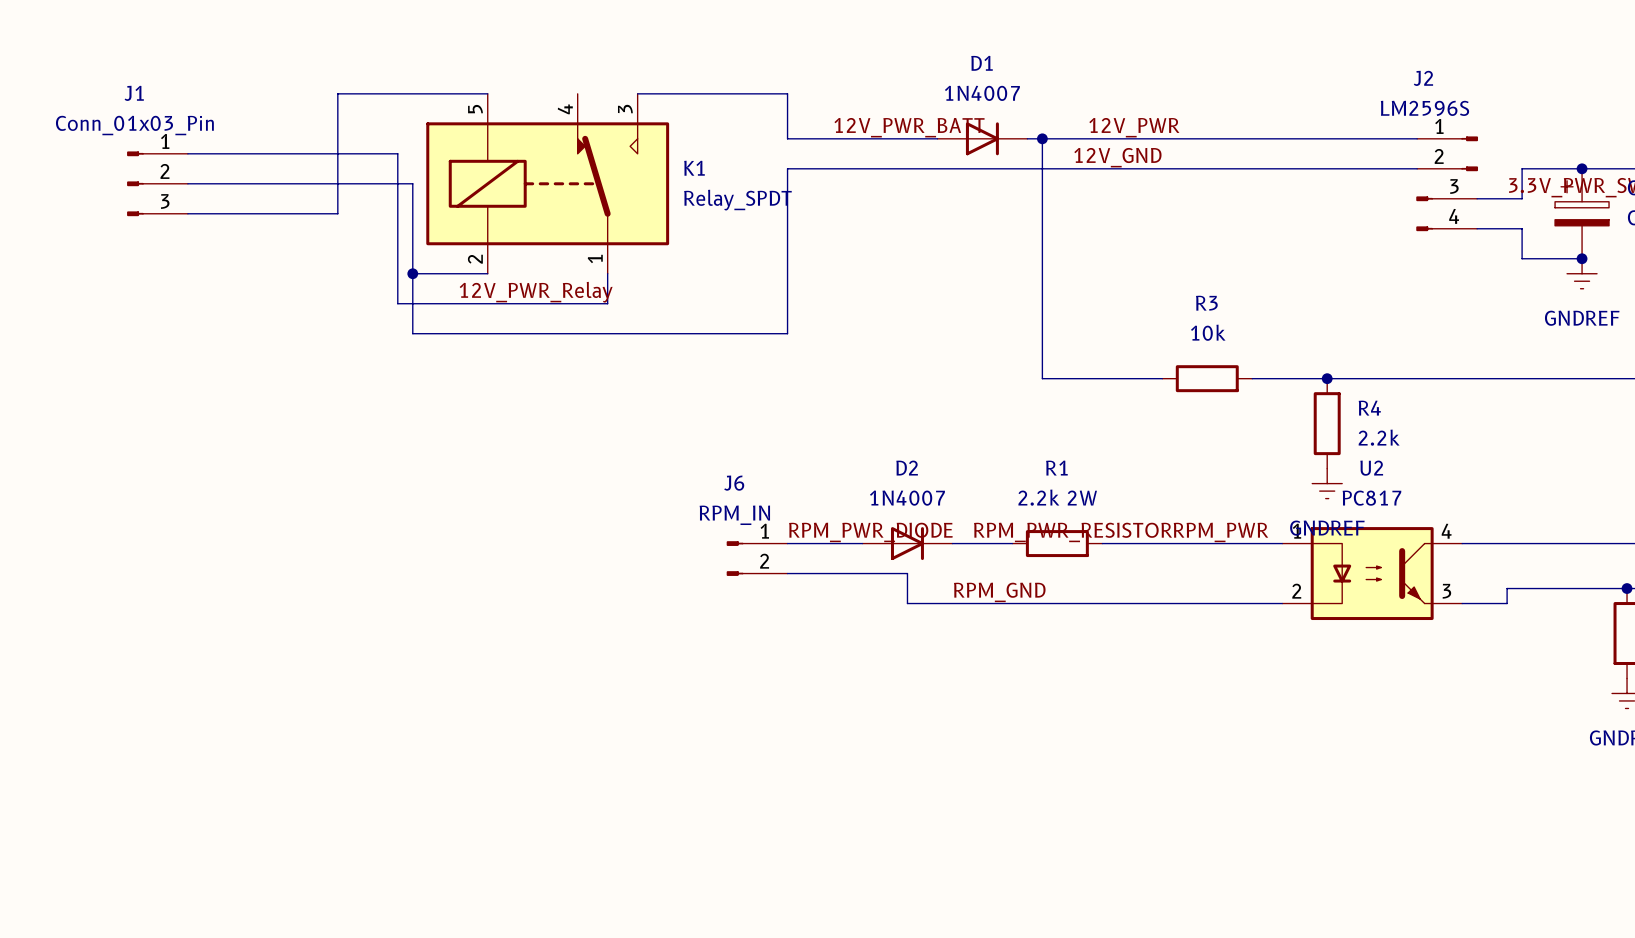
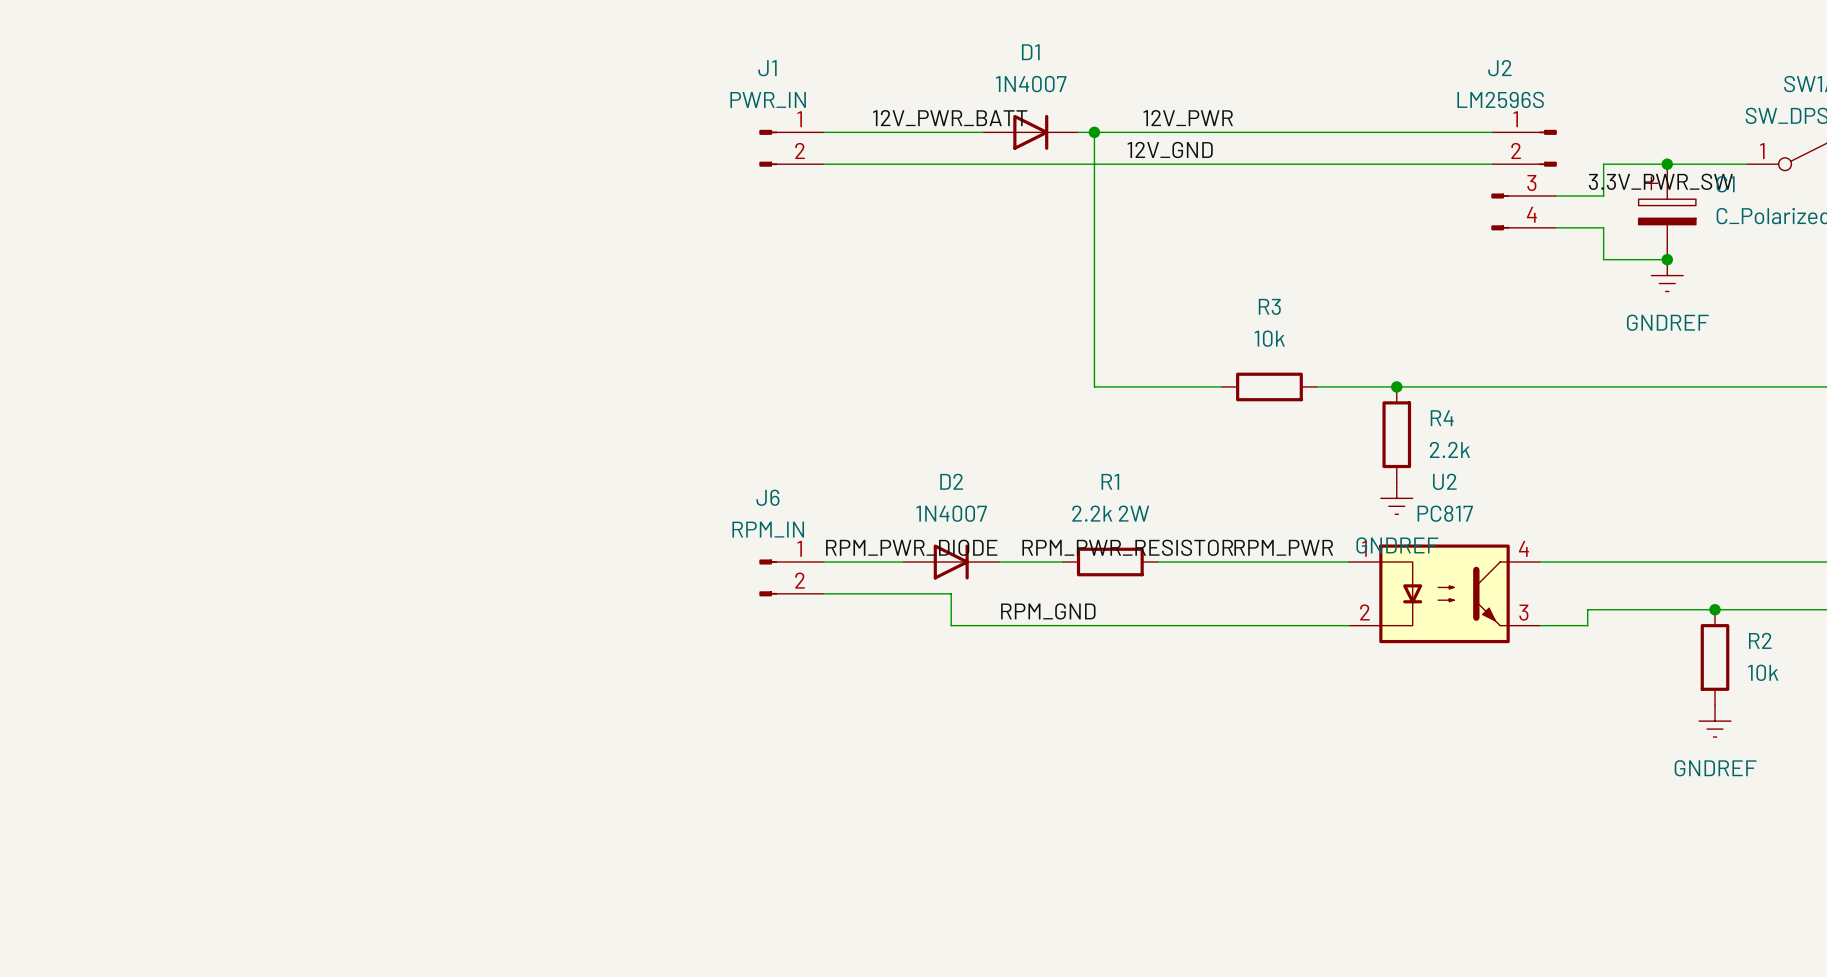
wire: (487, 93) (337, 93) (337, 213) (187, 213) -> none
wire: (637, 93) (787, 93) (787, 138) -> none
J1 value: Conn_01x03_Pin (134, 125) -> PWR_IN (768, 99)
J1 symbol: [127, 151, 188, 217] -> [759, 129, 824, 167]
wire: (187, 153) (397, 153) (397, 303) (607, 303) (607, 273) -> none
wire: (787, 168) (787, 333) (412, 333) (412, 183) (187, 183) -> none
K1: Relay_SPDT (547, 183) -> none
wire: (412, 273) (487, 273) -> none
junction: (412, 273) -> none
label: 12V_PWR_Relay (536, 292) -> none

